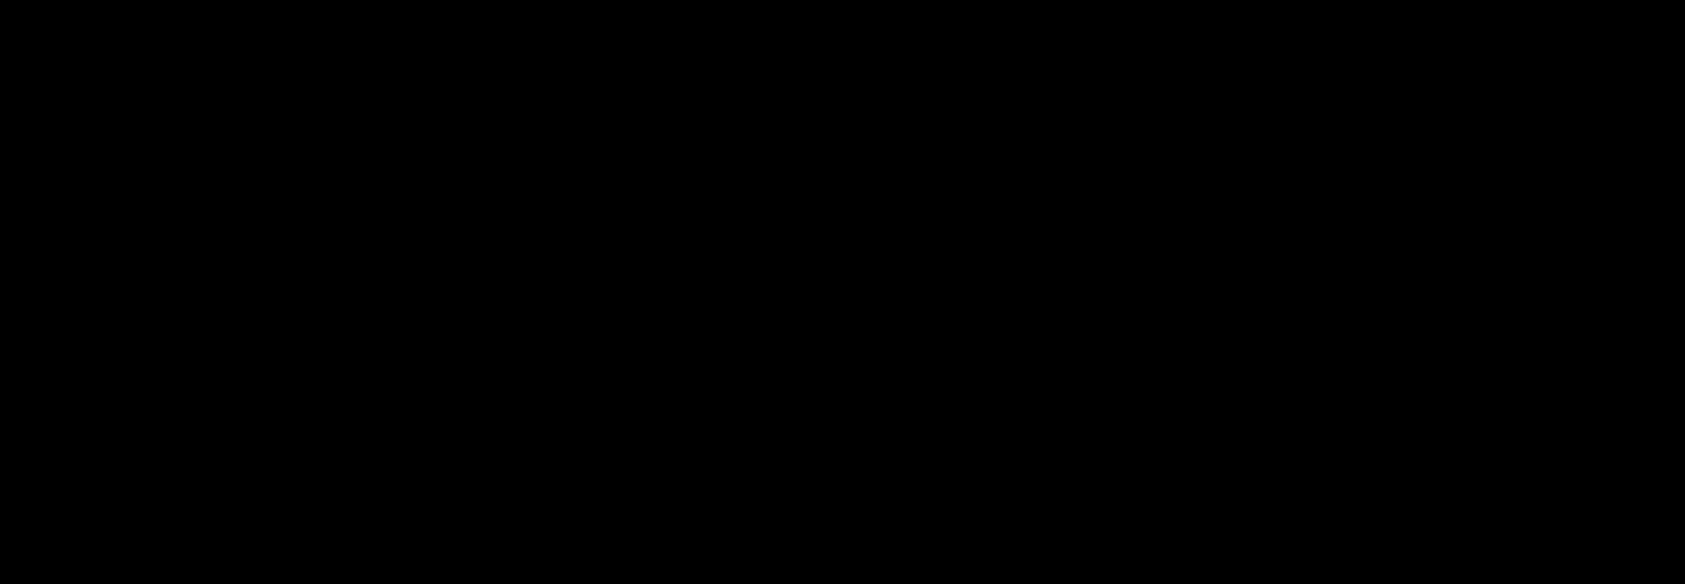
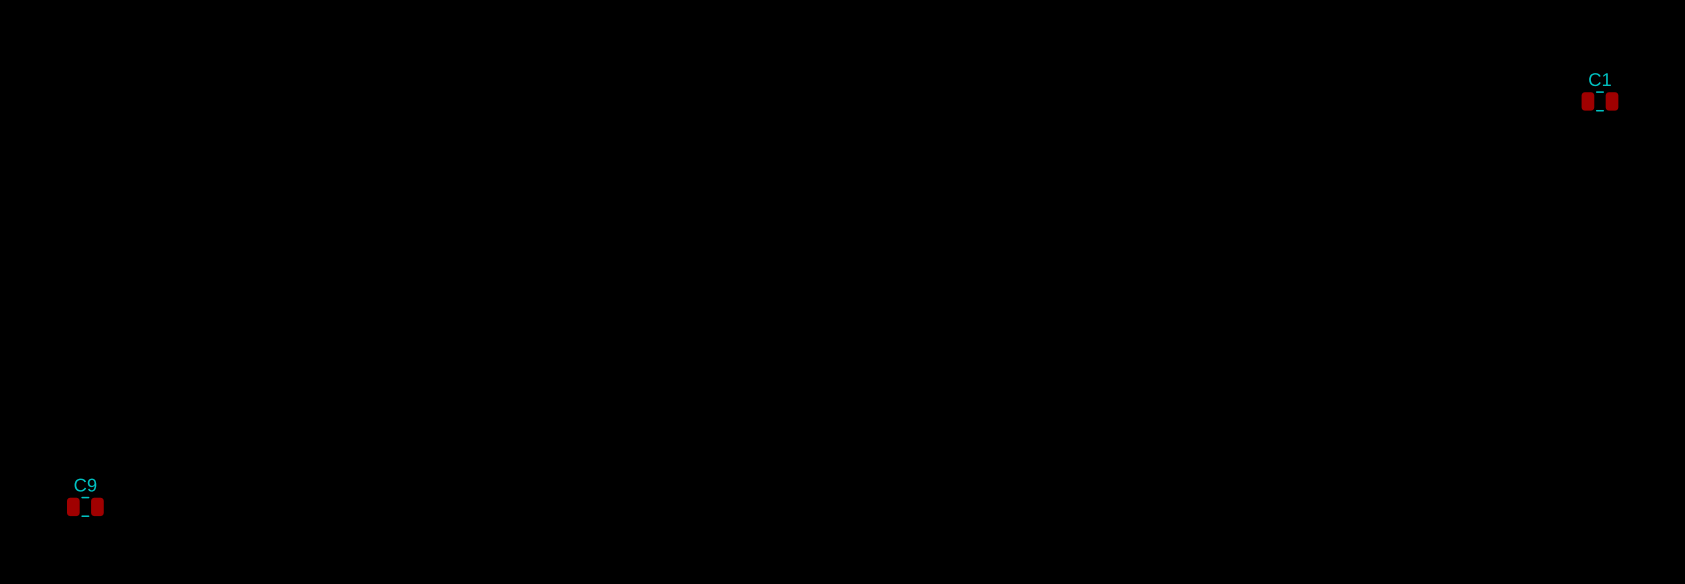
C1: none -> (1599, 101)
C9: none -> (85, 506)

